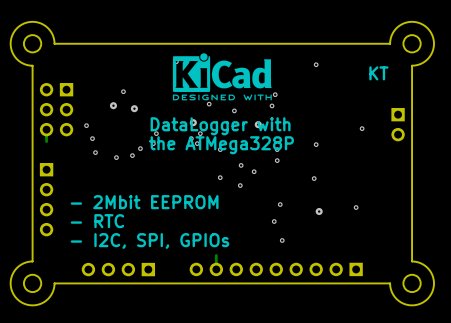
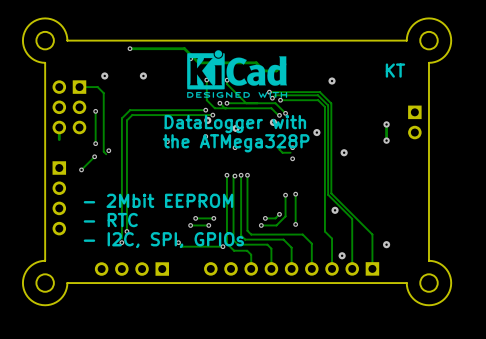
track: none -> (130, 48) (184, 48) (198, 62) (256, 62) (264, 70) (276, 70) (283, 64)
via: none -> (130, 48)
via: (316, 64) -> none
via: none -> (104, 75)
via: none -> (143, 75)
track: none -> (206, 80) (206, 100) (214, 108) (271, 108) (279, 115)
via: none -> (206, 80)
track: none -> (227, 80) (227, 84) (246, 103)
via: none -> (227, 80)
via: none -> (332, 81)
track: none -> (79, 87) (97, 87) (103, 93) (103, 151) (106, 154)
via: (123, 91) -> none
track: none -> (269, 92) (319, 92) (331, 103)
via: none -> (269, 92)
via: (275, 94) -> none
track: none -> (272, 98) (275, 95) (318, 95) (328, 105) (328, 194) (352, 218) (352, 268)
via: none -> (272, 98)
track: none -> (280, 100) (318, 100) (324, 106) (324, 231) (332, 238) (332, 268)
via: none -> (280, 100)
via: (209, 104) -> none
via: (113, 105) -> none
track: none -> (219, 103) (224, 108)
via: none -> (219, 103)
track: none -> (226, 103) (275, 103) (285, 113)
via: none -> (226, 103)
via: (272, 105) -> none
track: none -> (331, 103) (331, 193) (372, 234) (372, 268)
via: (134, 108) -> none
via: (234, 110) -> none
track: none -> (205, 110) (130, 110) (121, 118) (121, 238)
via: none -> (205, 110)
track: none -> (95, 111) (95, 143)
via: none -> (95, 111)
via: none -> (285, 113)
track: none -> (212, 115) (132, 115) (126, 120) (126, 231)
via: none -> (212, 115)
via: none -> (279, 115)
via: (86, 125) -> none
track: none -> (386, 124) (386, 140)
via: none -> (386, 124)
via: (362, 128) -> none
via: none -> (236, 128)
via: (156, 133) -> none
via: (200, 133) -> none
via: none -> (316, 132)
via: (92, 138) -> none
via: none -> (386, 140)
via: (197, 143) -> none
via: (316, 144) -> none
via: none -> (95, 143)
via: (140, 148) -> none
track: none -> (279, 148) (282, 152) (290, 152)
via: none -> (344, 152)
via: (132, 155) -> none
via: (116, 157) -> none
track: none -> (94, 156) (81, 169)
via: none -> (94, 156)
via: (241, 165) -> none
via: none -> (81, 169)
via: (254, 171) -> none
track: none -> (226, 175) (226, 243) (234, 250) (247, 250) (251, 254) (251, 268)
via: none -> (226, 175)
track: none -> (233, 175) (233, 240) (238, 244) (267, 244) (271, 248) (271, 268)
track: none -> (241, 175) (241, 235) (245, 239) (283, 239) (291, 247) (291, 268)
via: none -> (241, 175)
track: none -> (247, 175) (247, 230) (251, 234) (302, 234) (311, 243) (311, 268)
via: none -> (247, 175)
via: (314, 178) -> none
via: (240, 185) -> none
track: none -> (295, 194) (295, 224)
via: none -> (295, 194)
track: none -> (285, 195) (285, 216) (276, 225) (261, 225)
via: none -> (285, 195)
via: (280, 204) -> none
via: (356, 207) -> none
track: none -> (279, 214) (275, 218) (265, 218)
via: none -> (279, 214)
via: none -> (195, 218)
track: none -> (213, 218) (195, 218)
via: none -> (213, 218)
via: none -> (265, 218)
via: (274, 221) -> none
via: none -> (295, 224)
via: none -> (190, 225)
track: none -> (208, 225) (190, 225)
via: none -> (208, 225)
via: none -> (261, 225)
via: none -> (126, 231)
via: (282, 240) -> none
via: none -> (121, 242)
track: none -> (178, 242) (182, 246) (222, 246)
via: none -> (178, 242)
via: none -> (386, 244)
via: none -> (222, 246)
track: (216, 255) (216, 269) -> none
via: none -> (342, 255)

